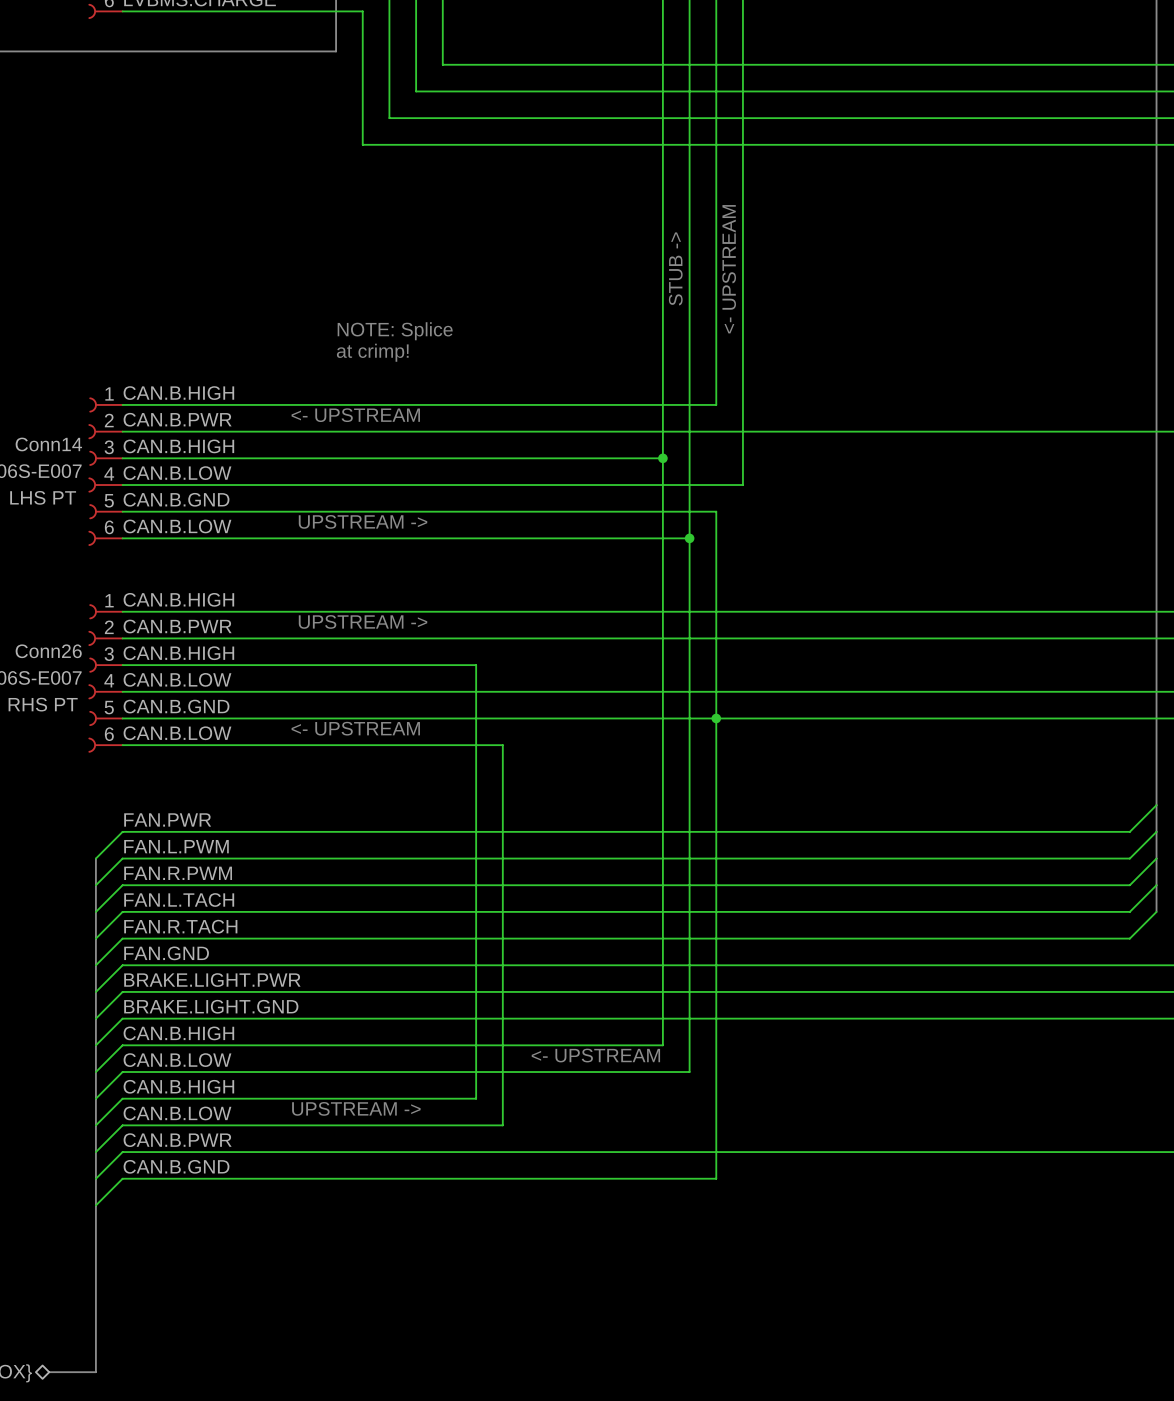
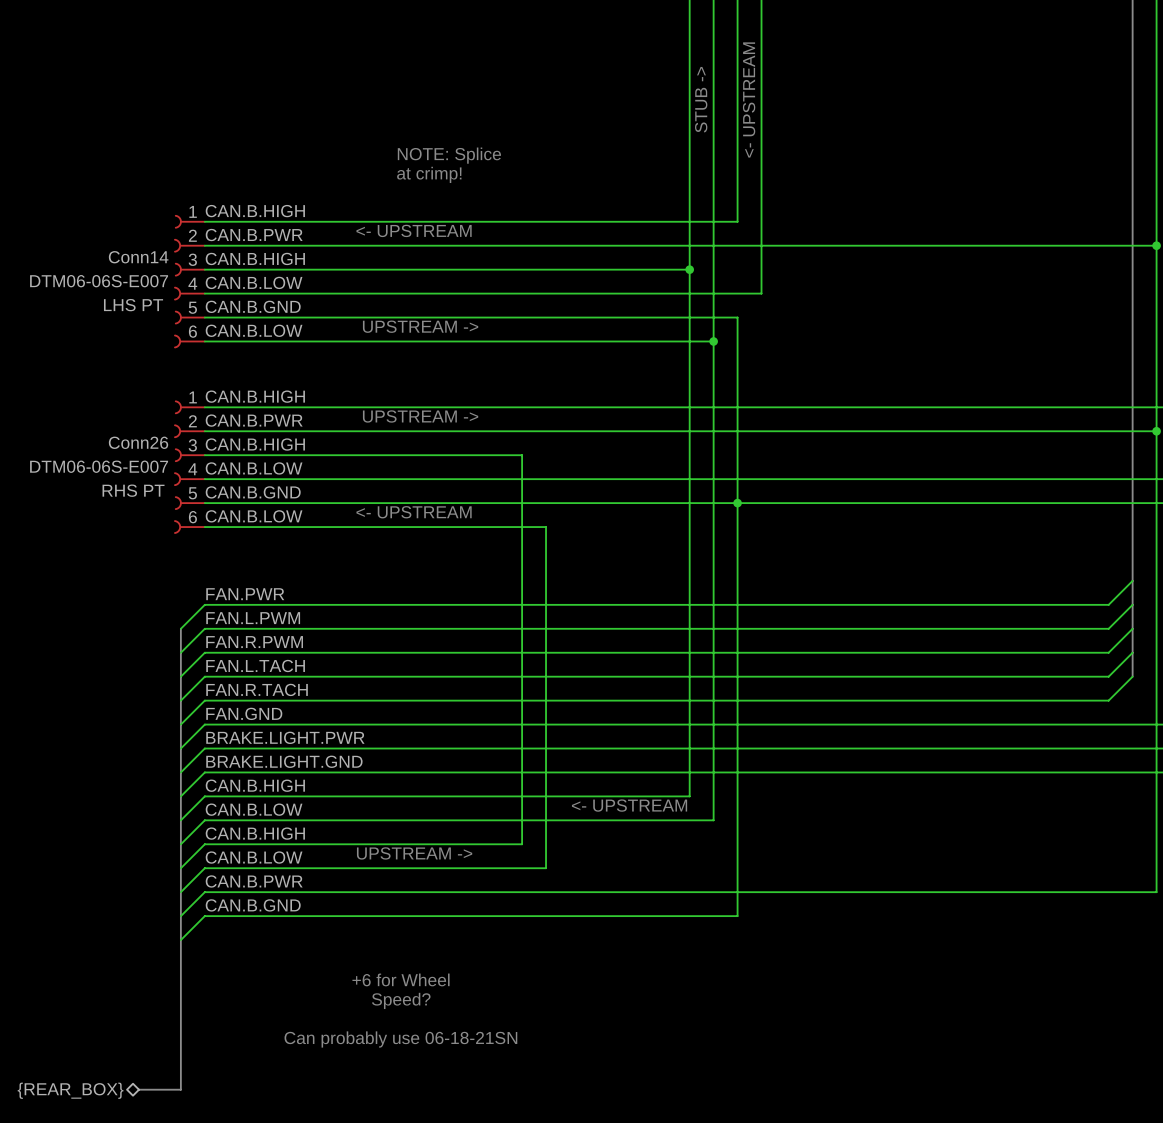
text: none -> +6 for Wheel (401, 979)
text: none -> Speed? (401, 1000)
text: none -> Can probably use 06-18-21SN (400, 1039)

